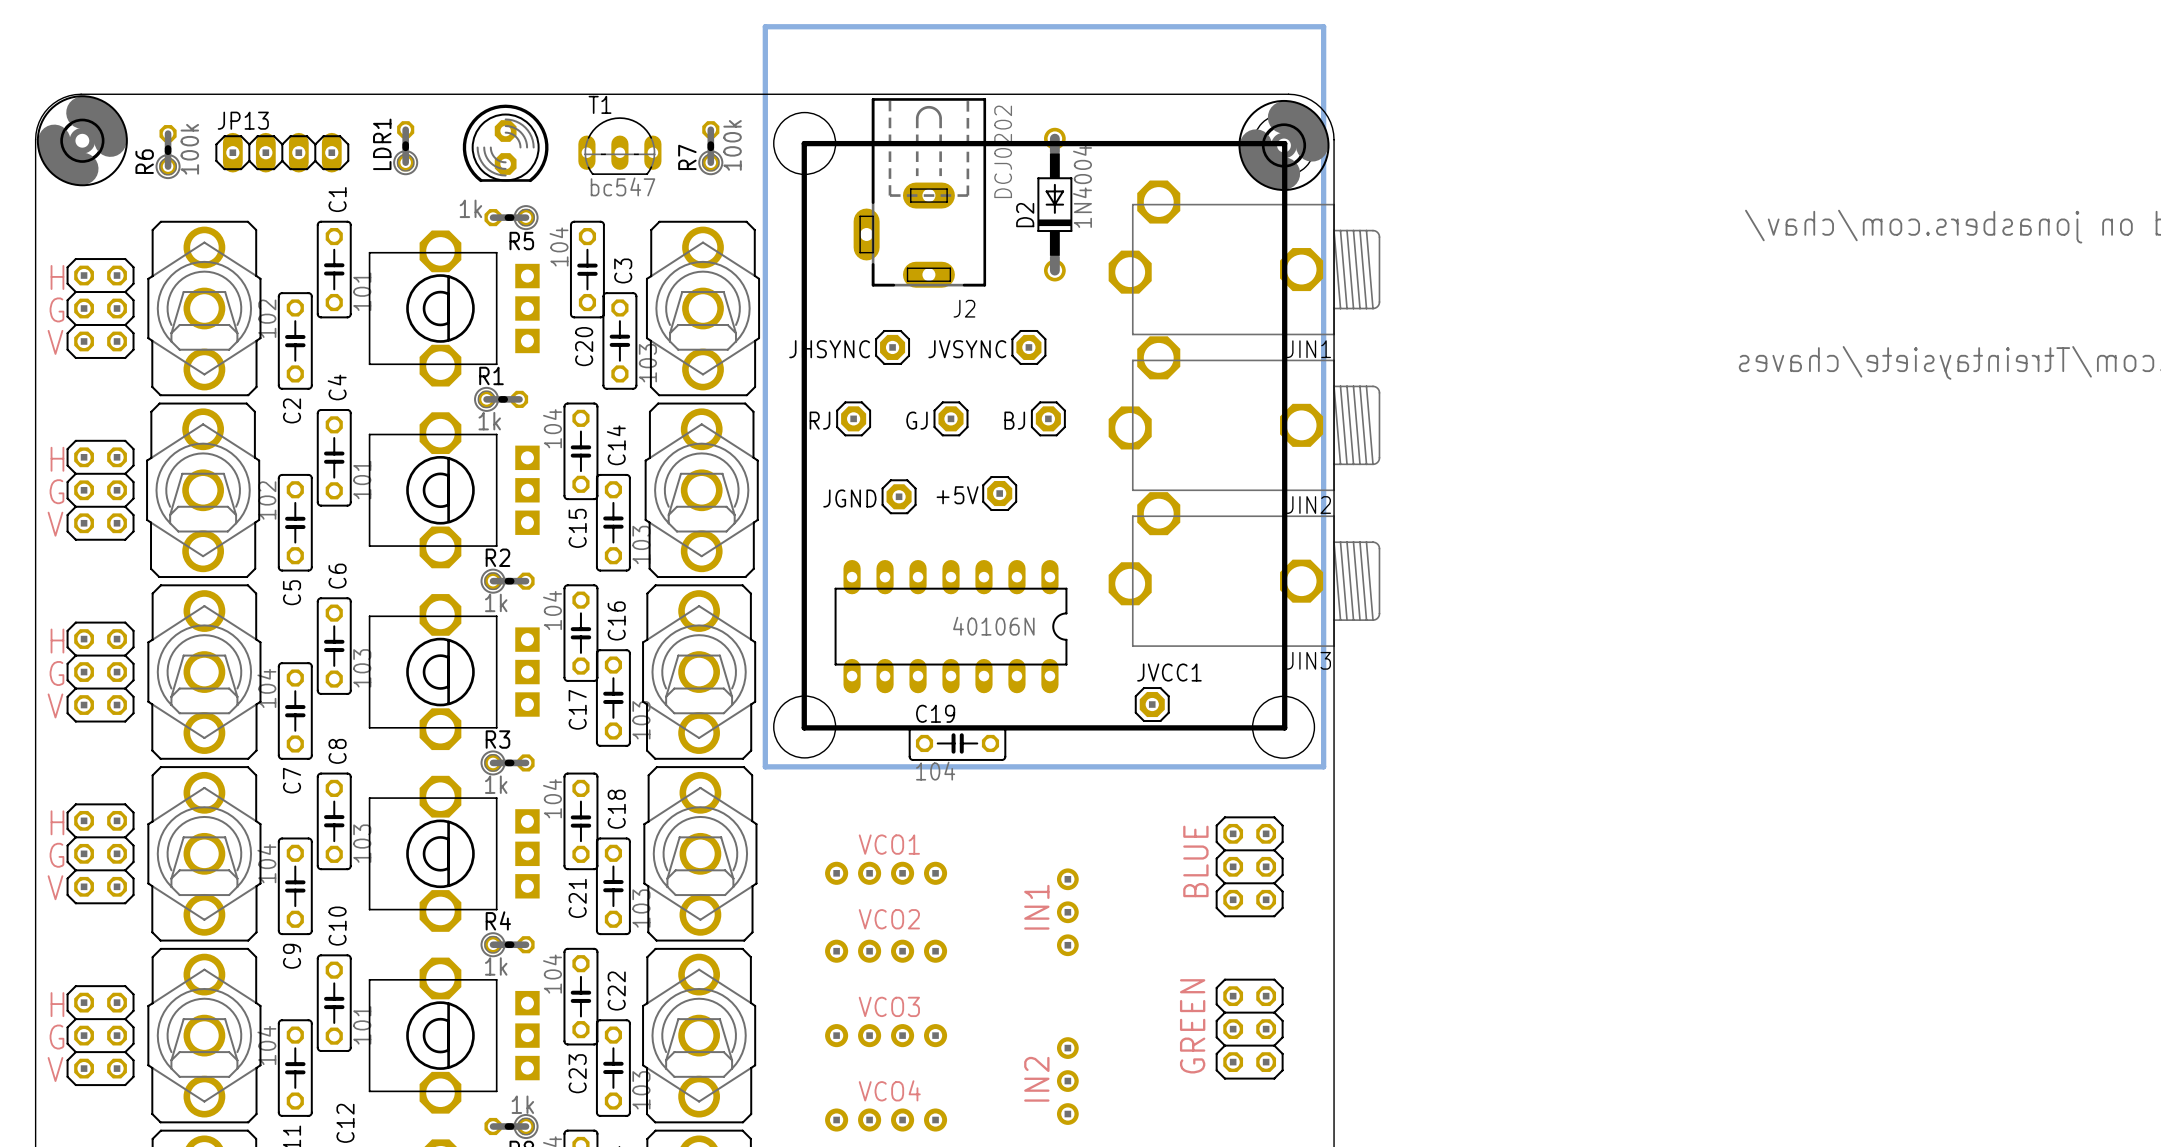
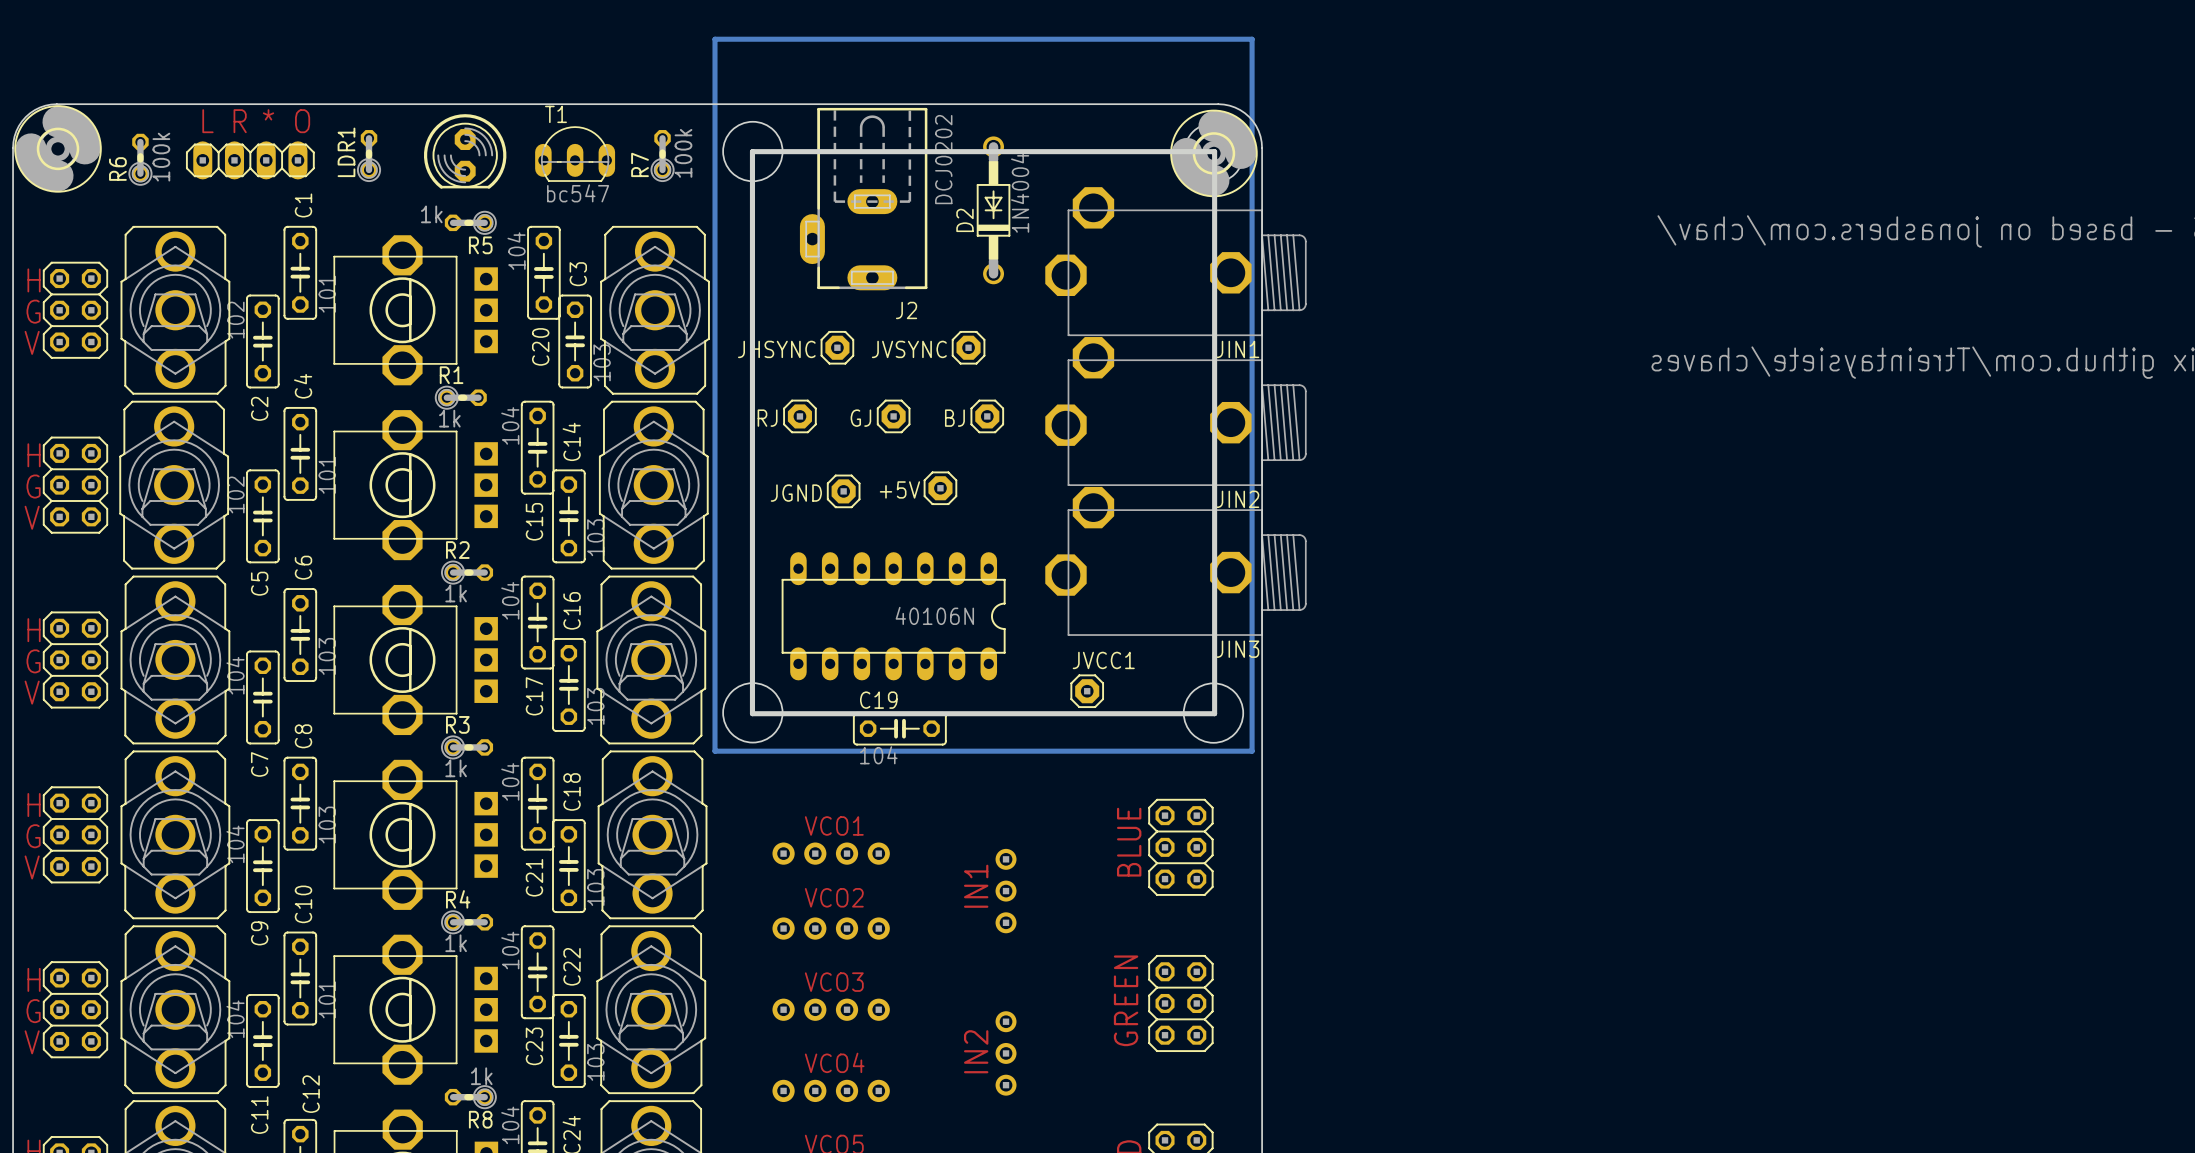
text: none -> * (268, 114)
text: none -> L (207, 121)
text: none -> R (240, 121)
text: none -> O (302, 121)
JP13 name: JP13 (243, 120) -> none

